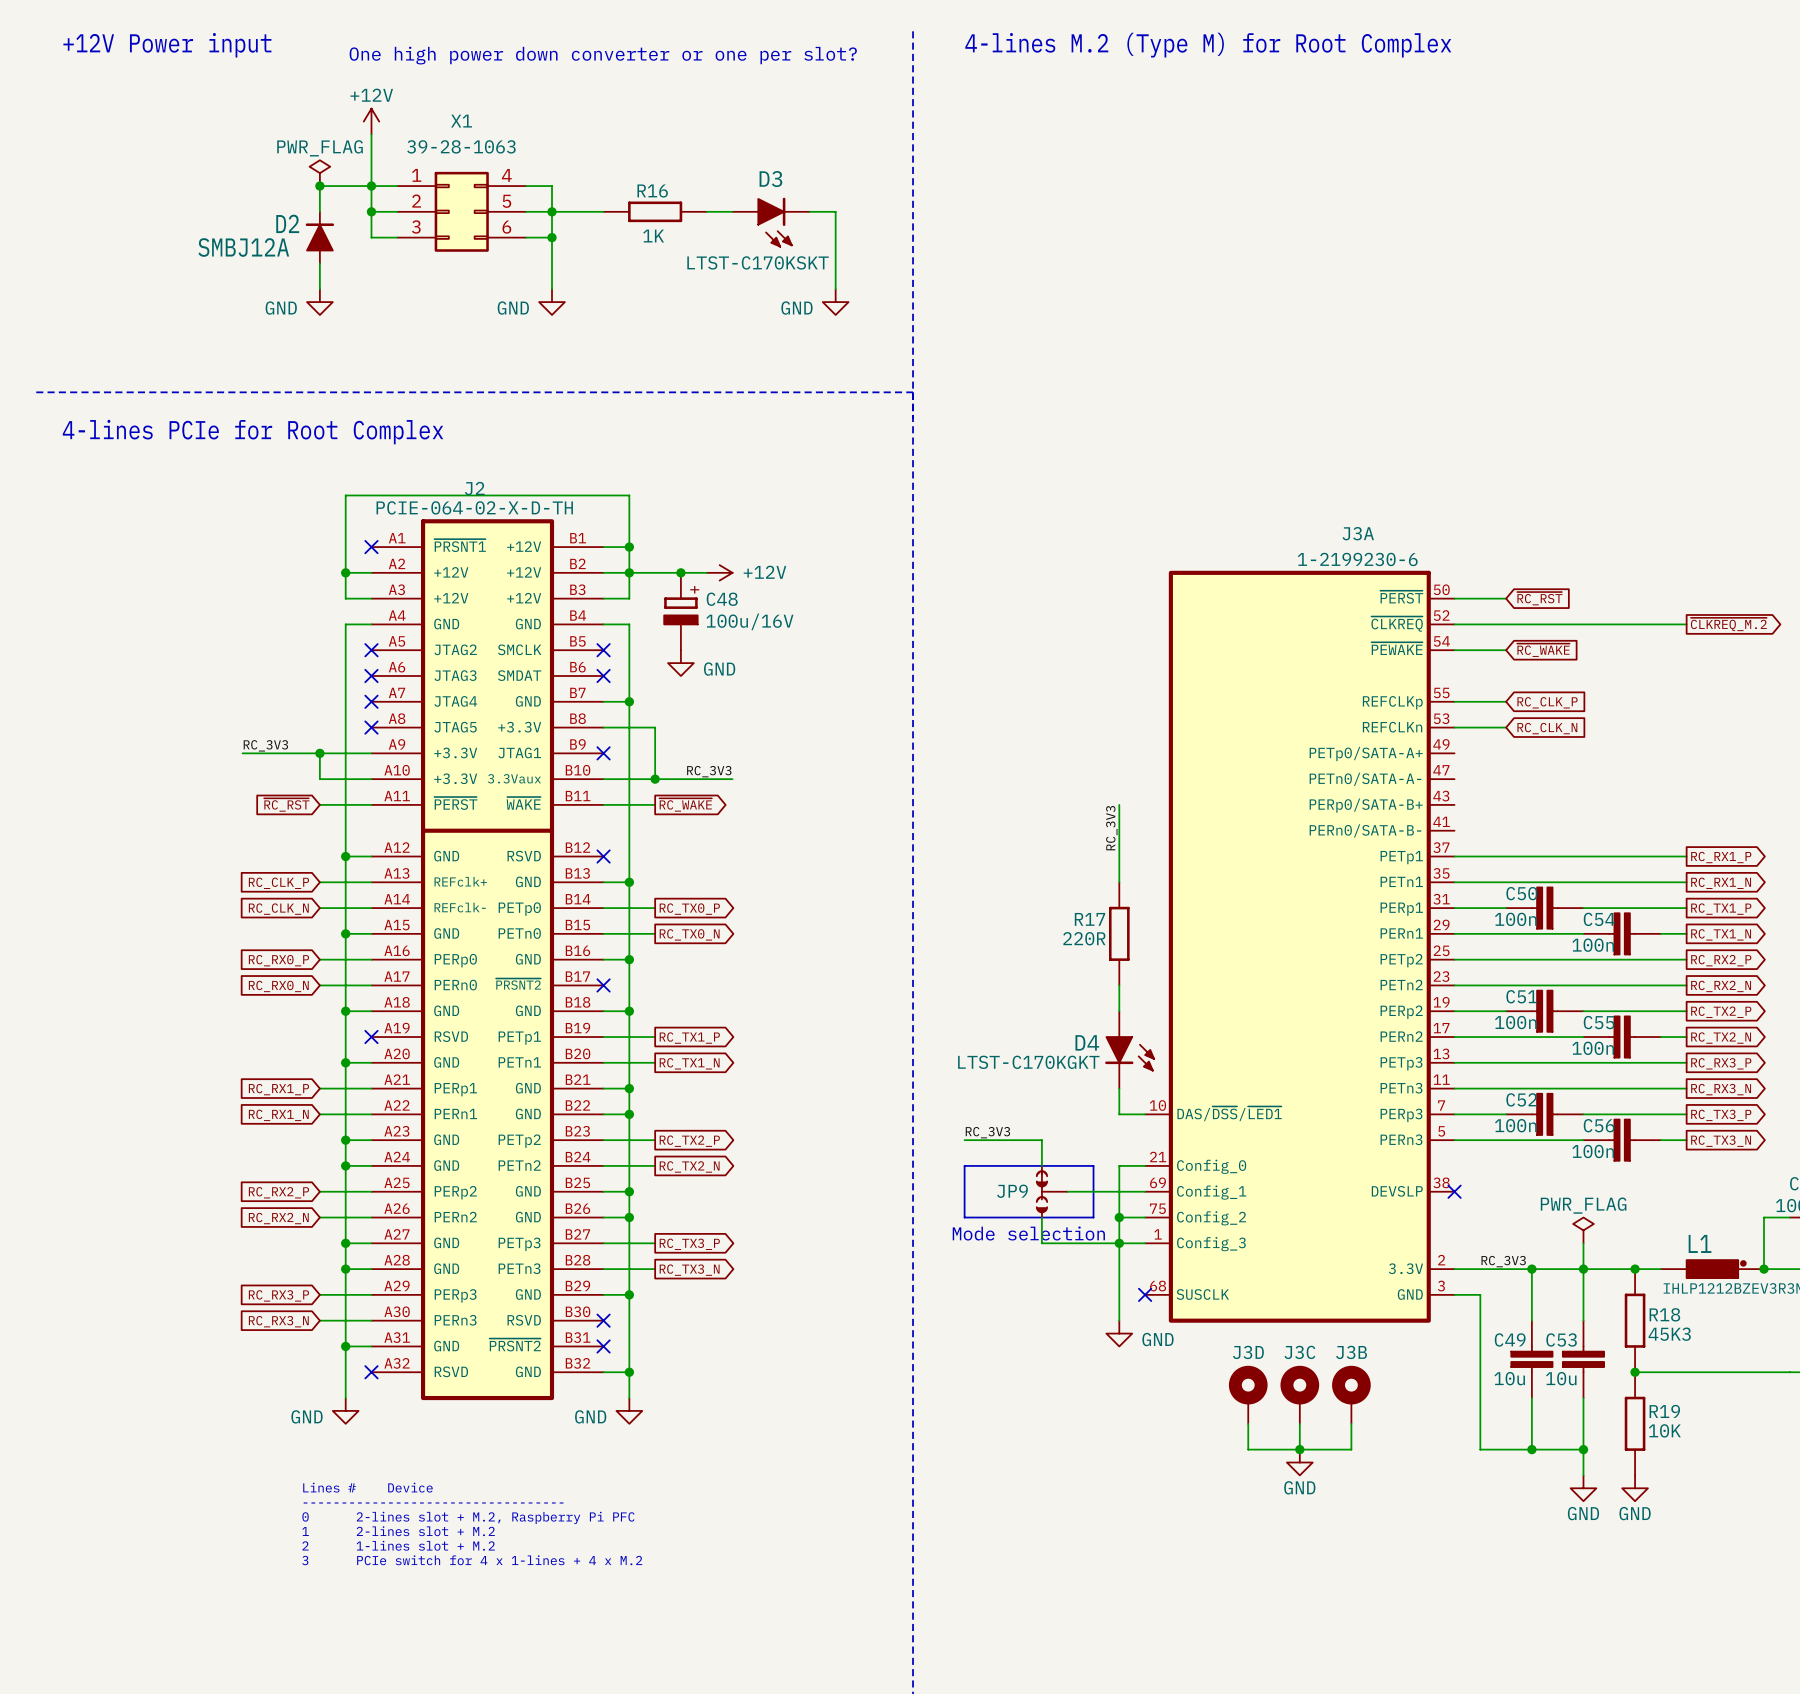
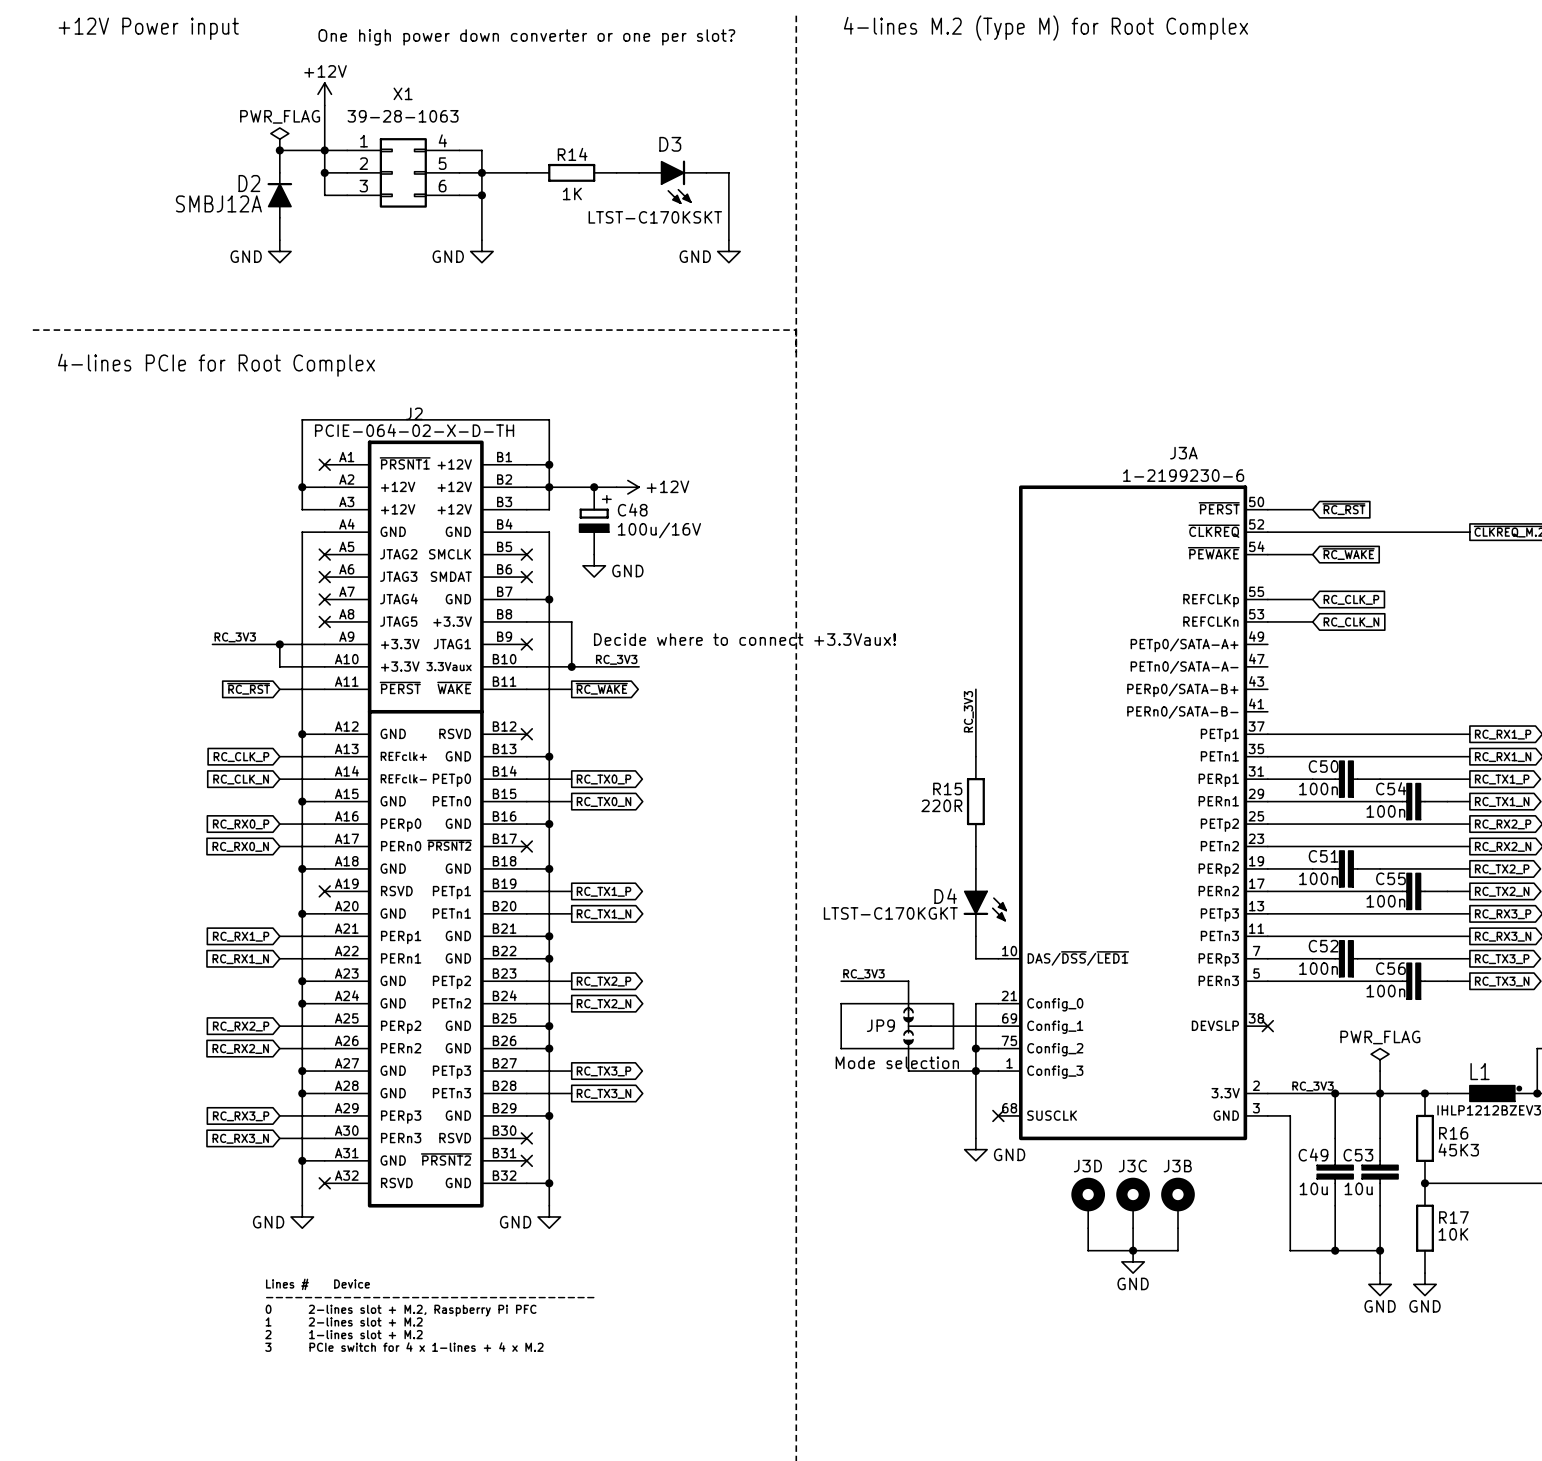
R16 name: R16 (652, 191) -> R14 (572, 154)
text: none -> Decide where to connect +3.3Vaux! (744, 639)
R17 name: R17 (1089, 919) -> R15 (947, 788)
R18 name: R18 (1664, 1314) -> R16 (1453, 1133)
R19 name: R19 (1664, 1411) -> R17 (1453, 1217)

